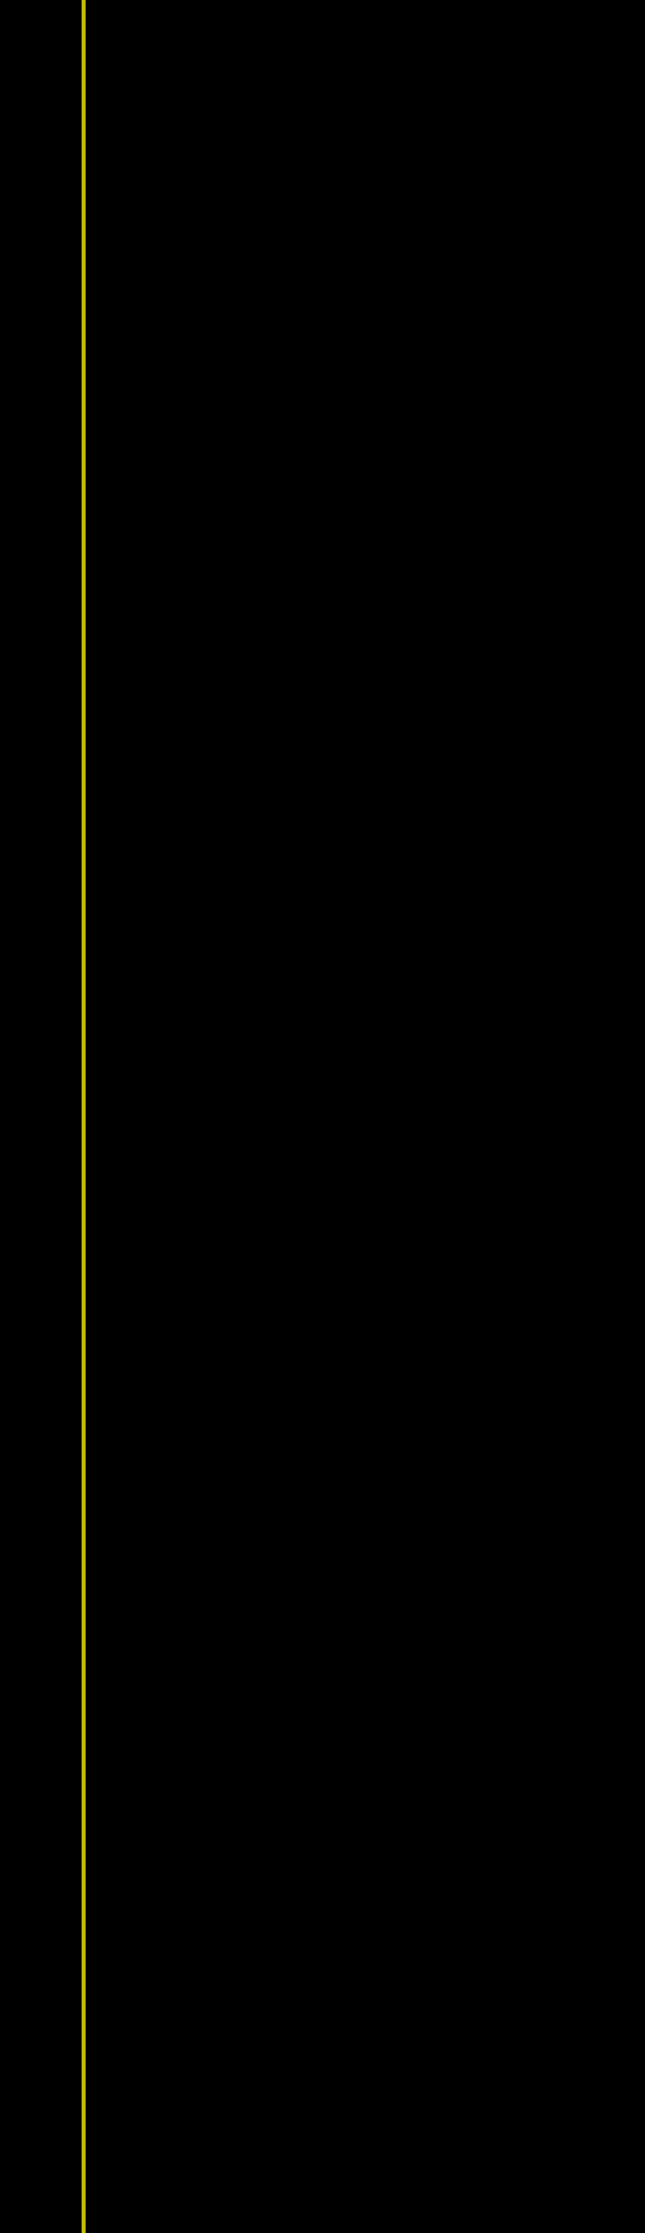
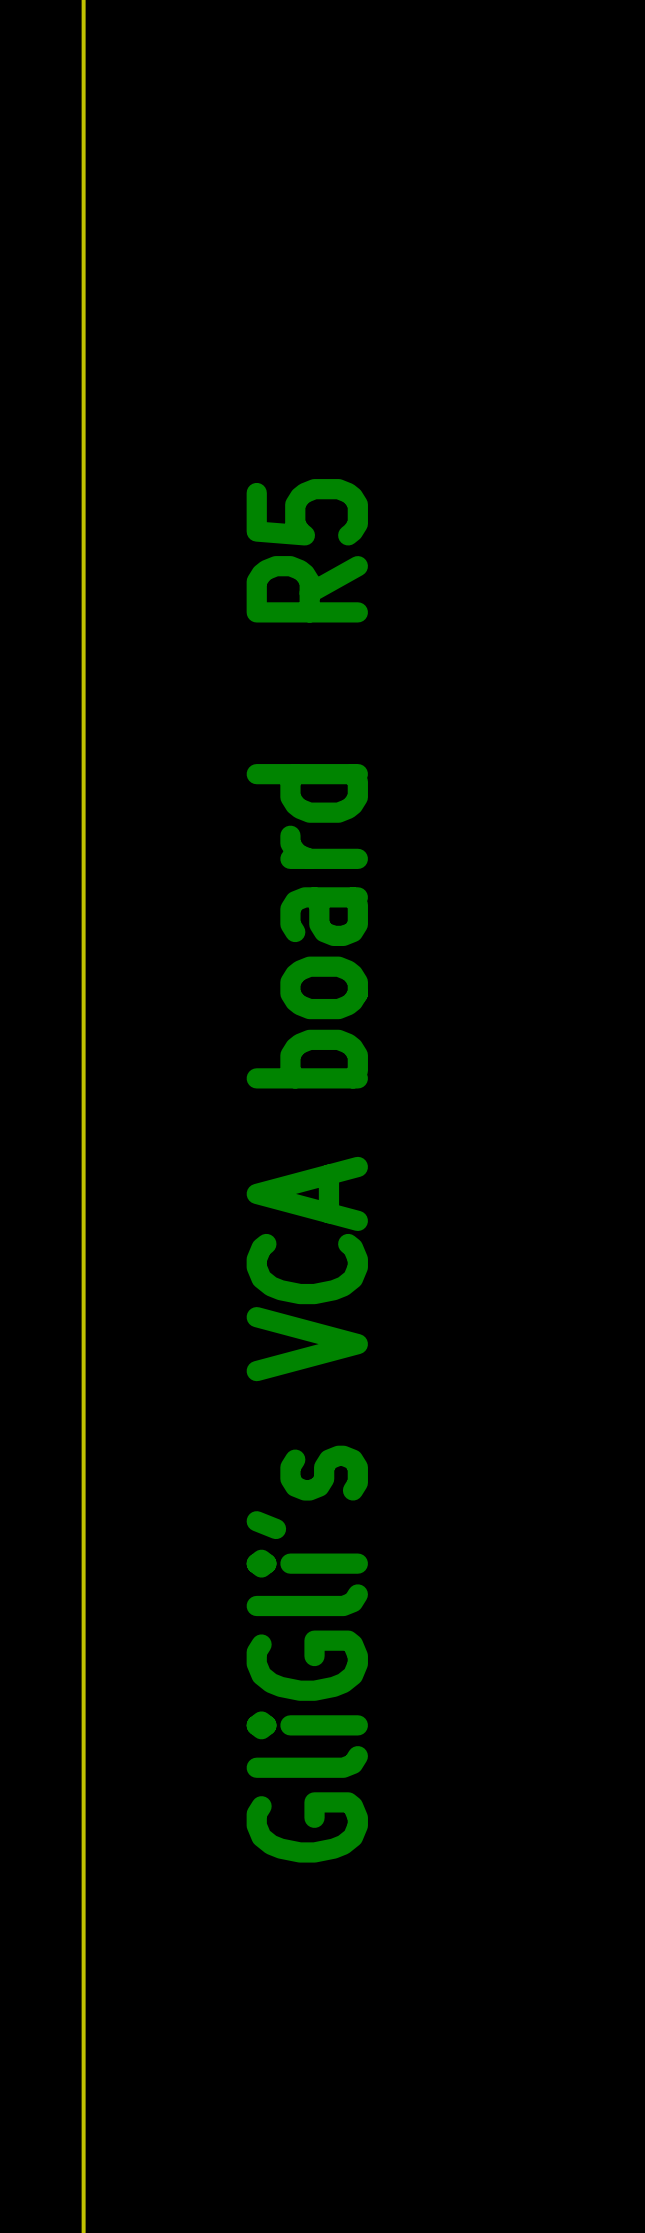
text: none -> GliGli's VCA board R5 (307, 1170)

